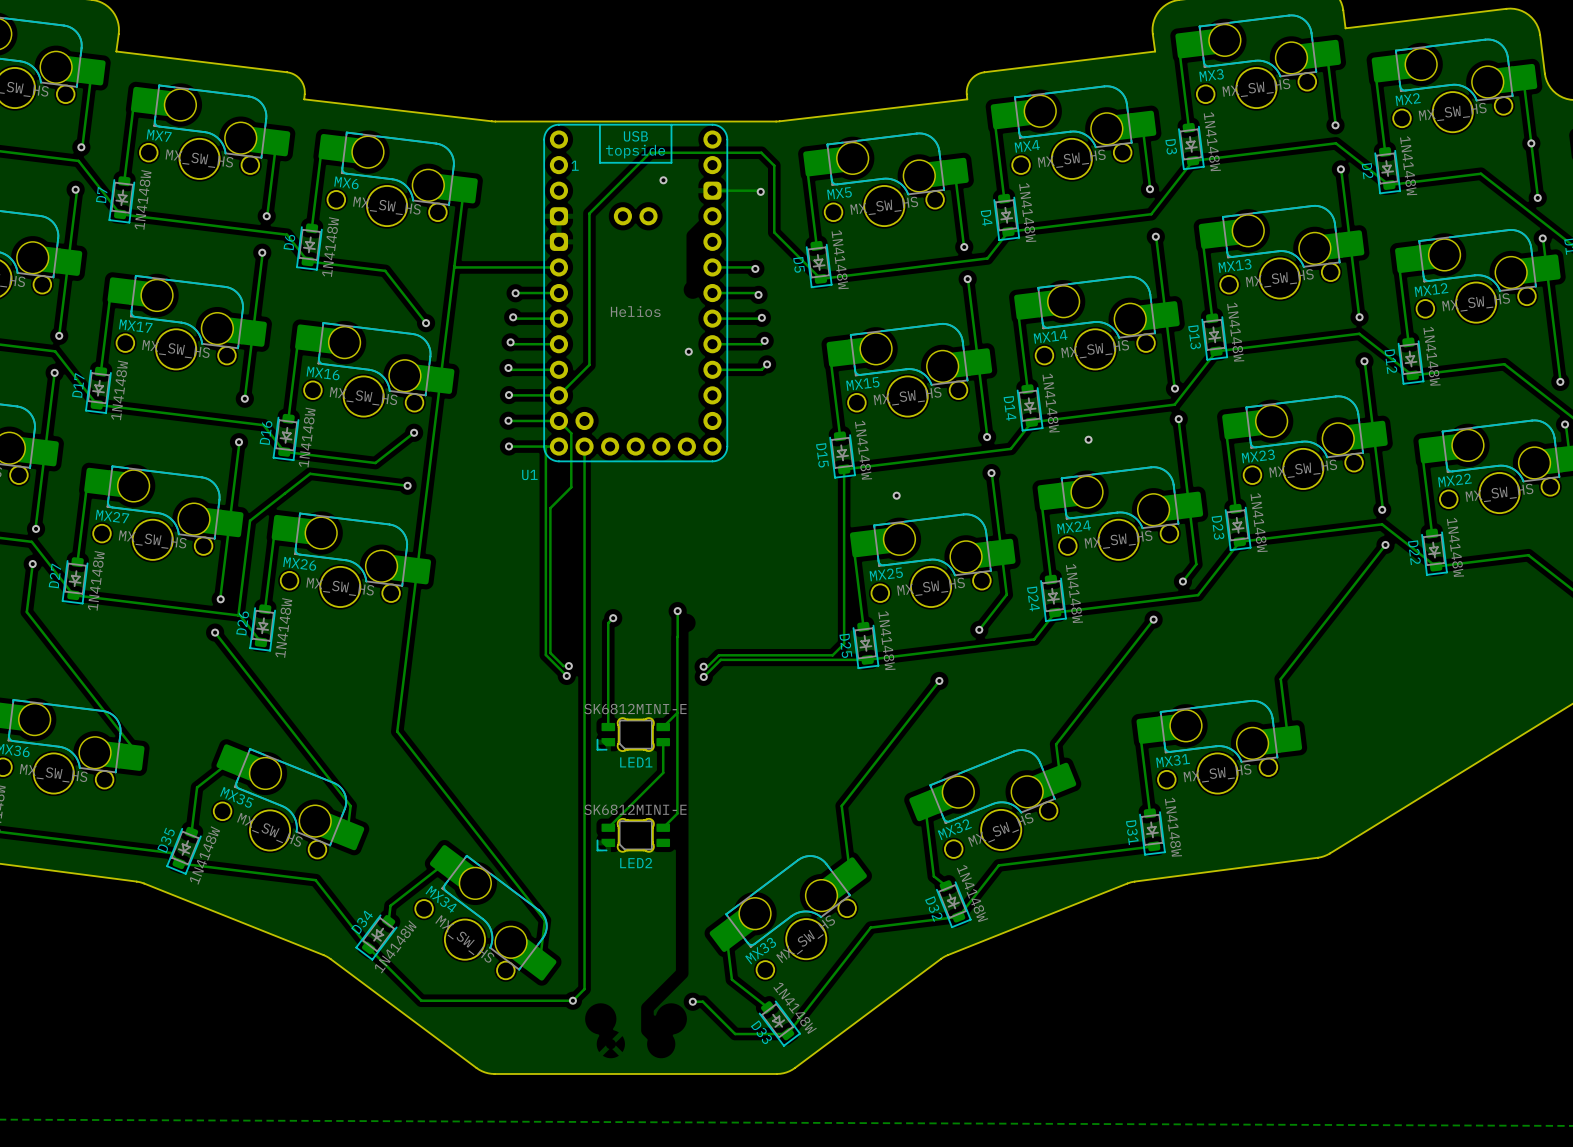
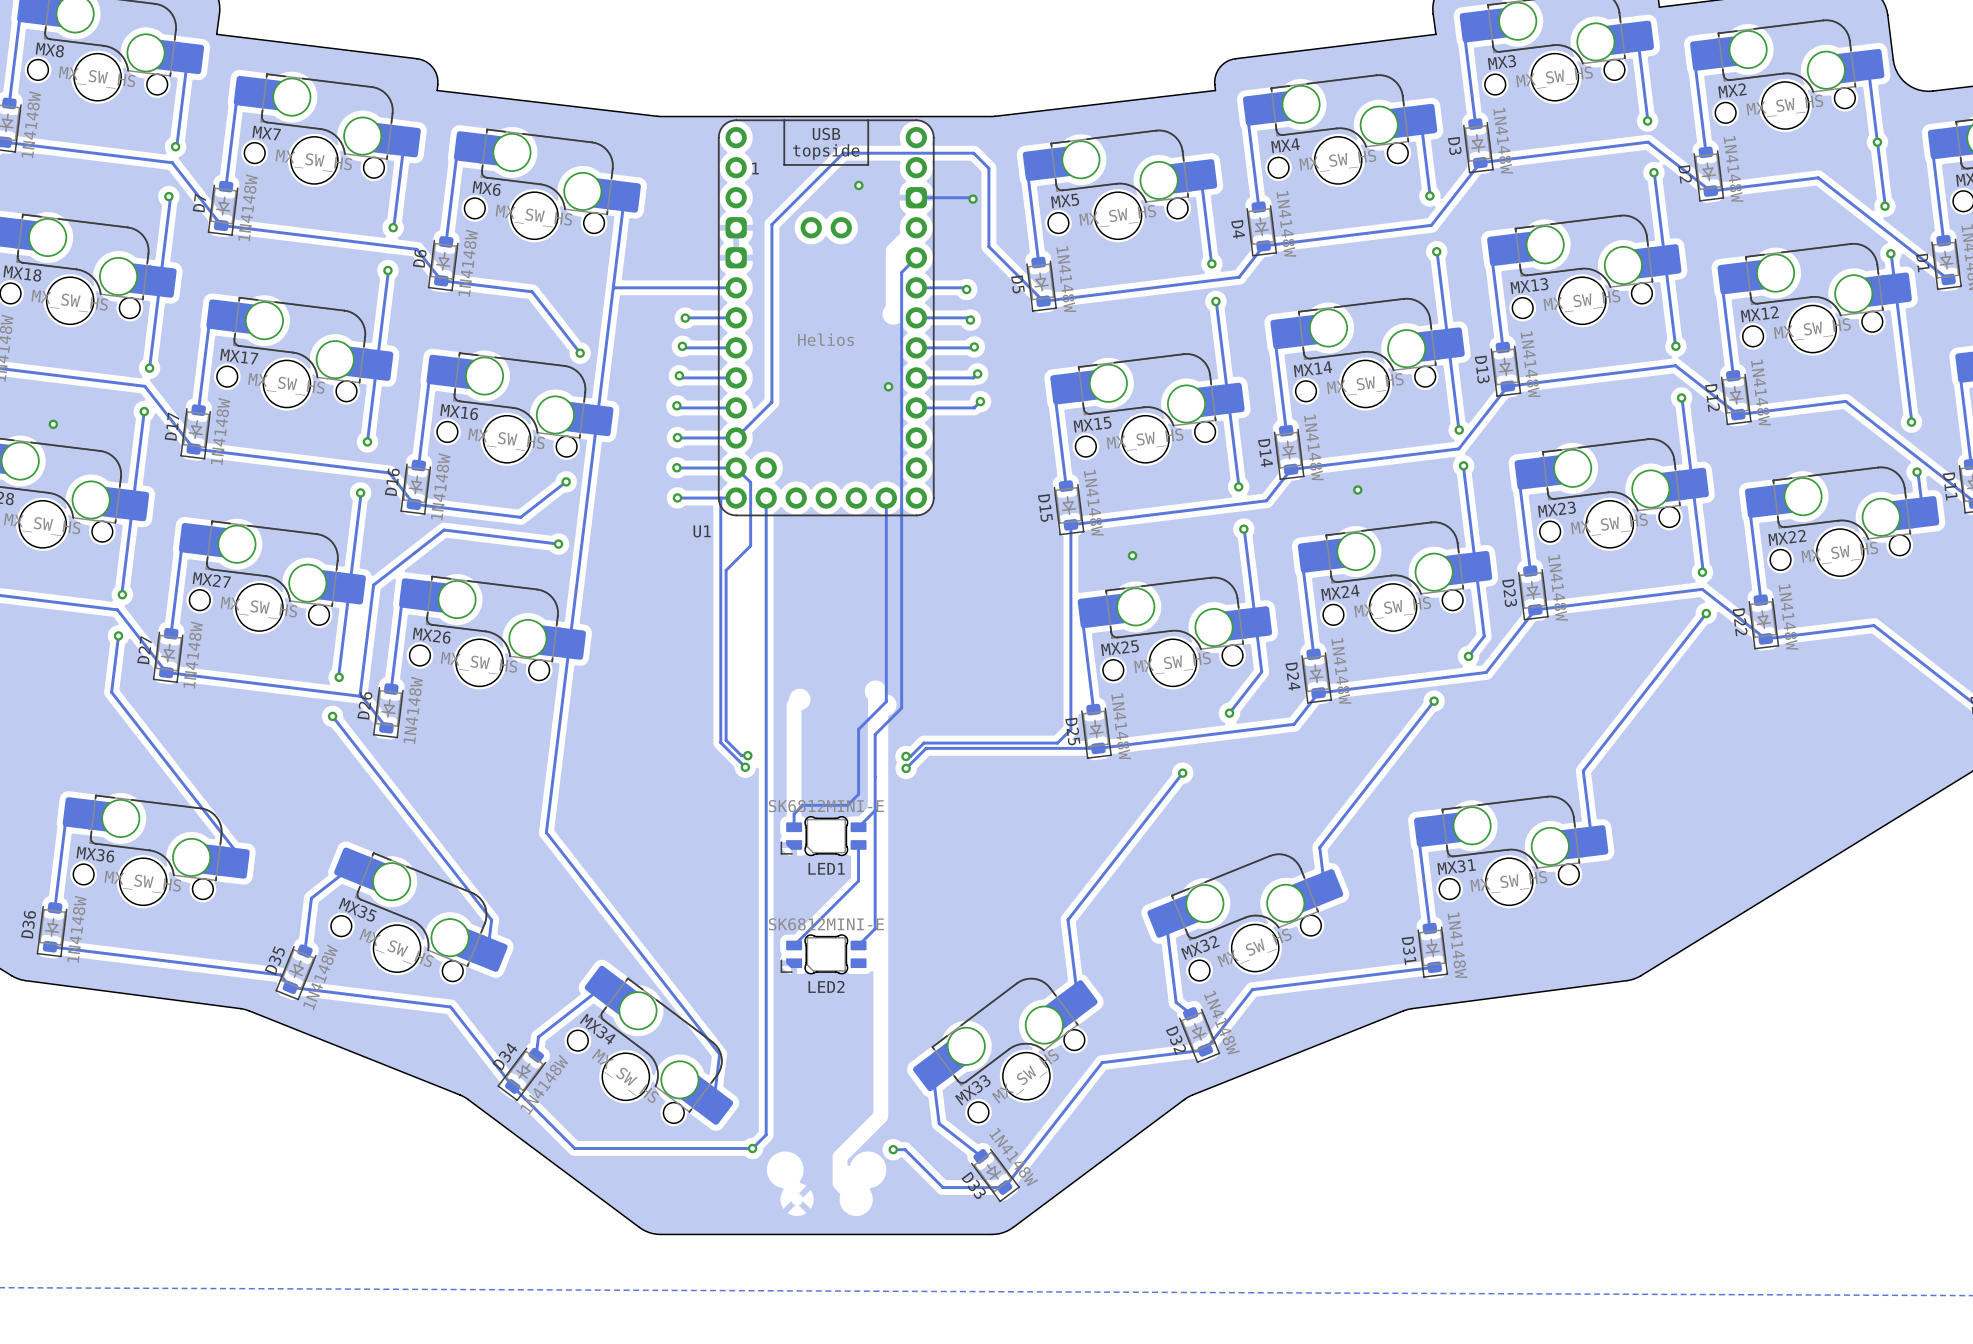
track: (677, 611) (677, 648) -> (916, 257) (901, 272) (901, 708) (875, 734)
via: (677, 611) -> none
track: (613, 618) (608, 623) (608, 726) -> (886, 498) (886, 701) (858, 729) (858, 794) (847, 805) (802, 805) (794, 814) (794, 827)
via: (613, 618) -> none

